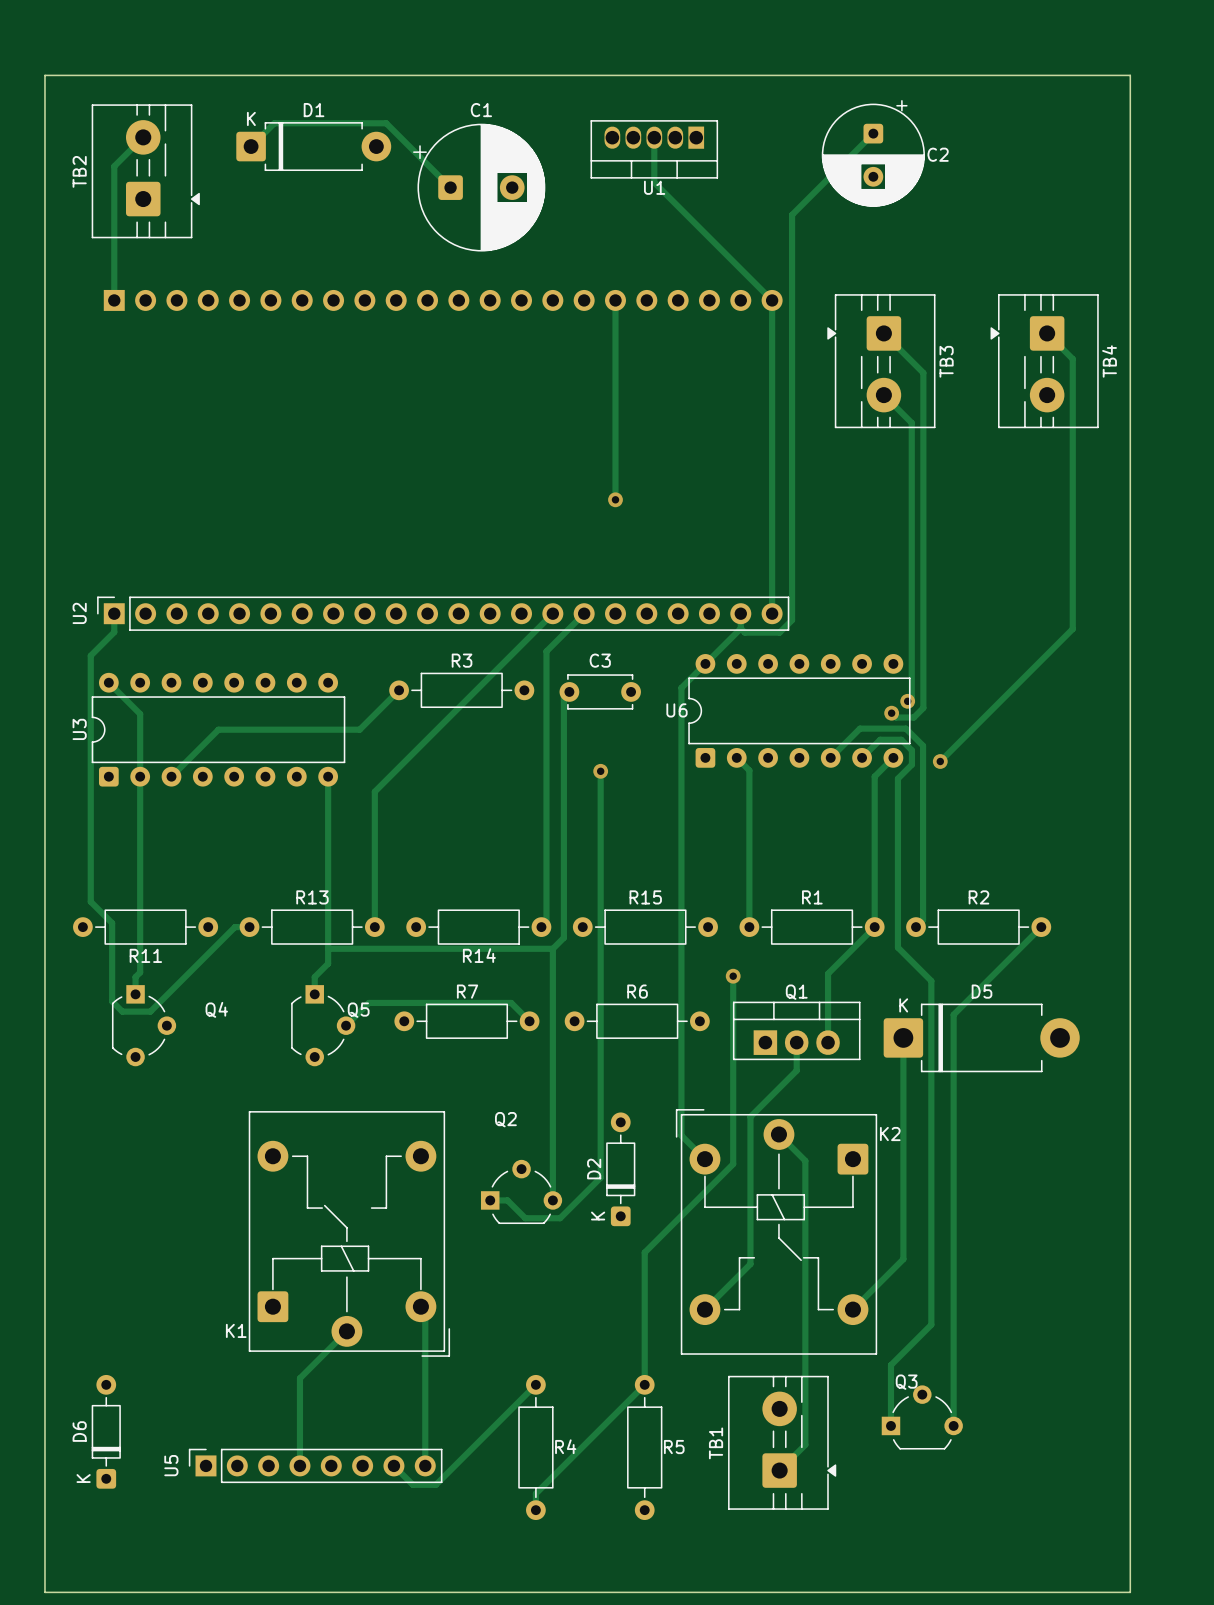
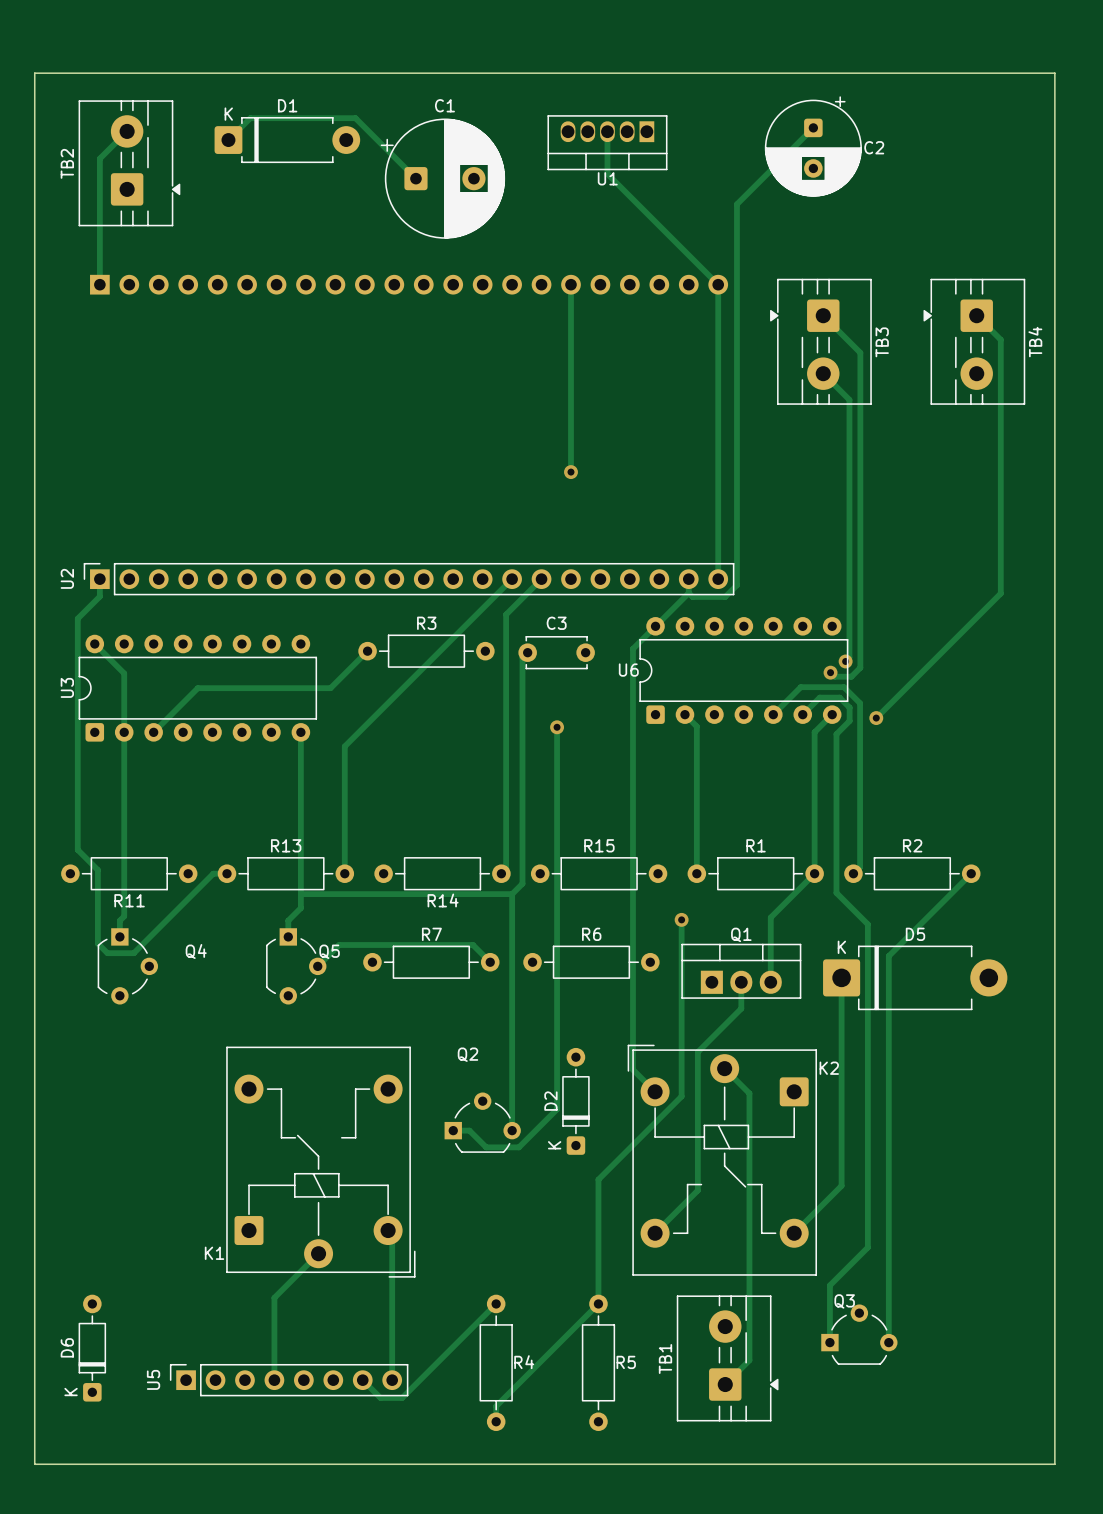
board edge: (44, 1555) (44, 1592) (1130, 1592) (1130, 1555) -> (34, 1464) (1054, 1464)

